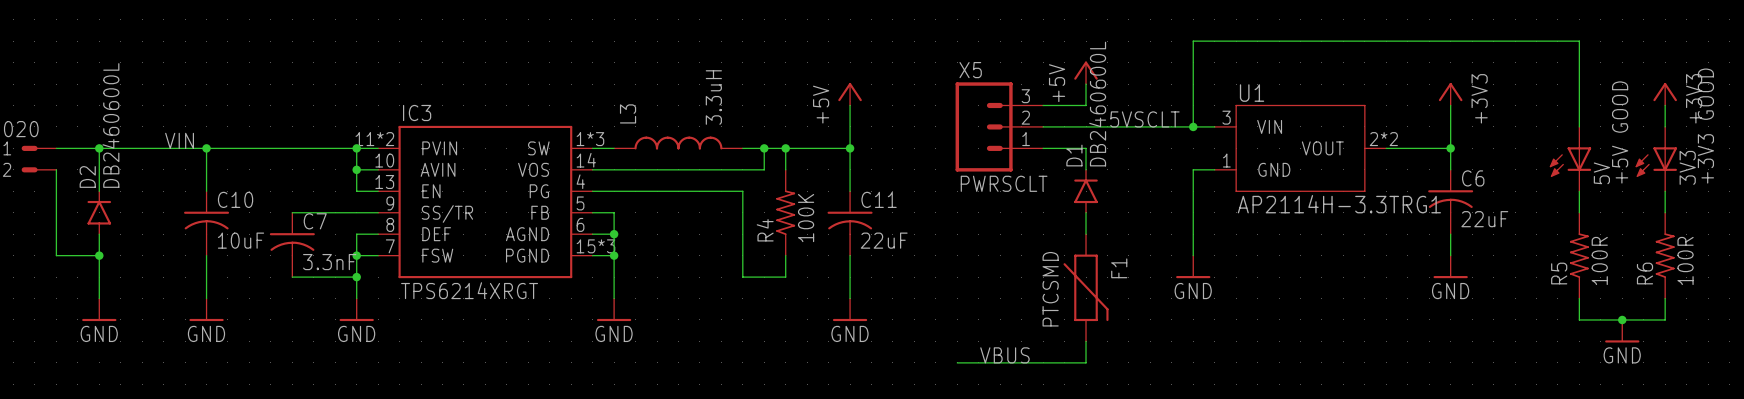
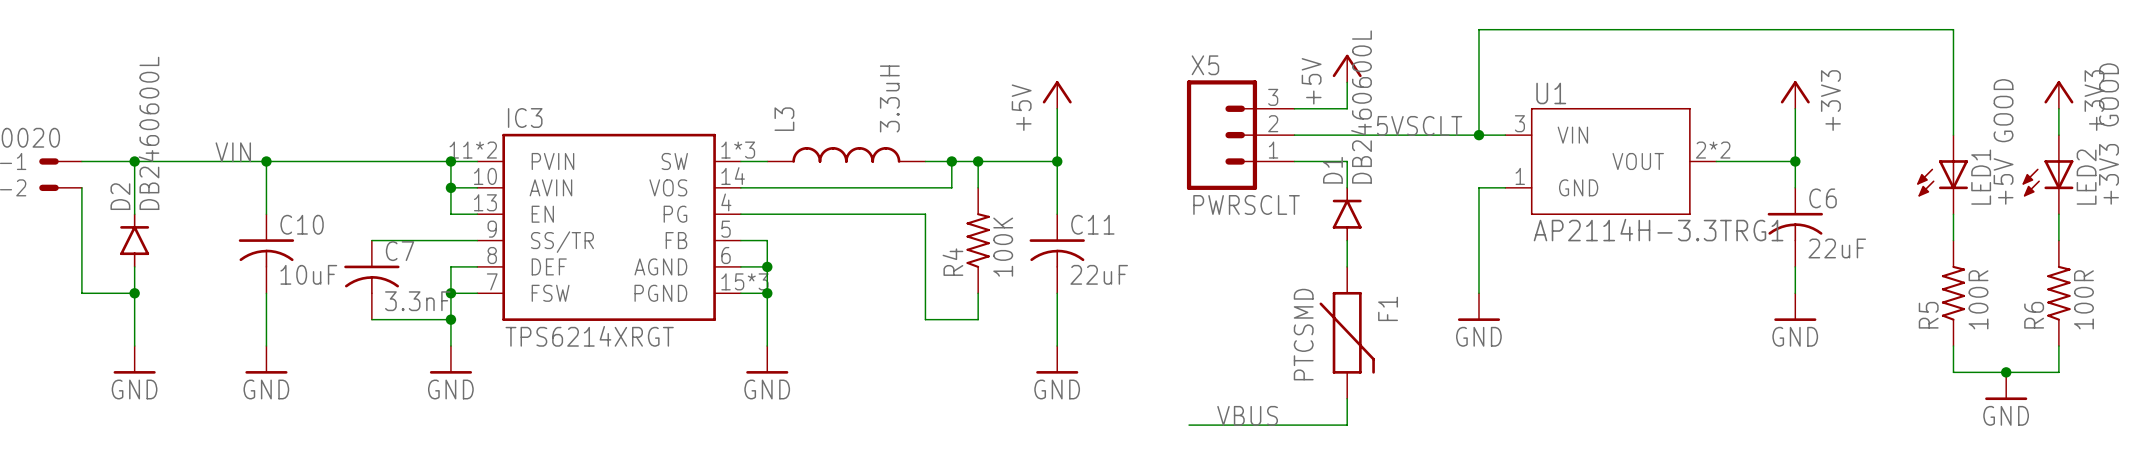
3V3 name: 3V3 (1687, 167) -> LED2 (2086, 177)
5V name: 5V (1601, 173) -> LED1 (1981, 177)

